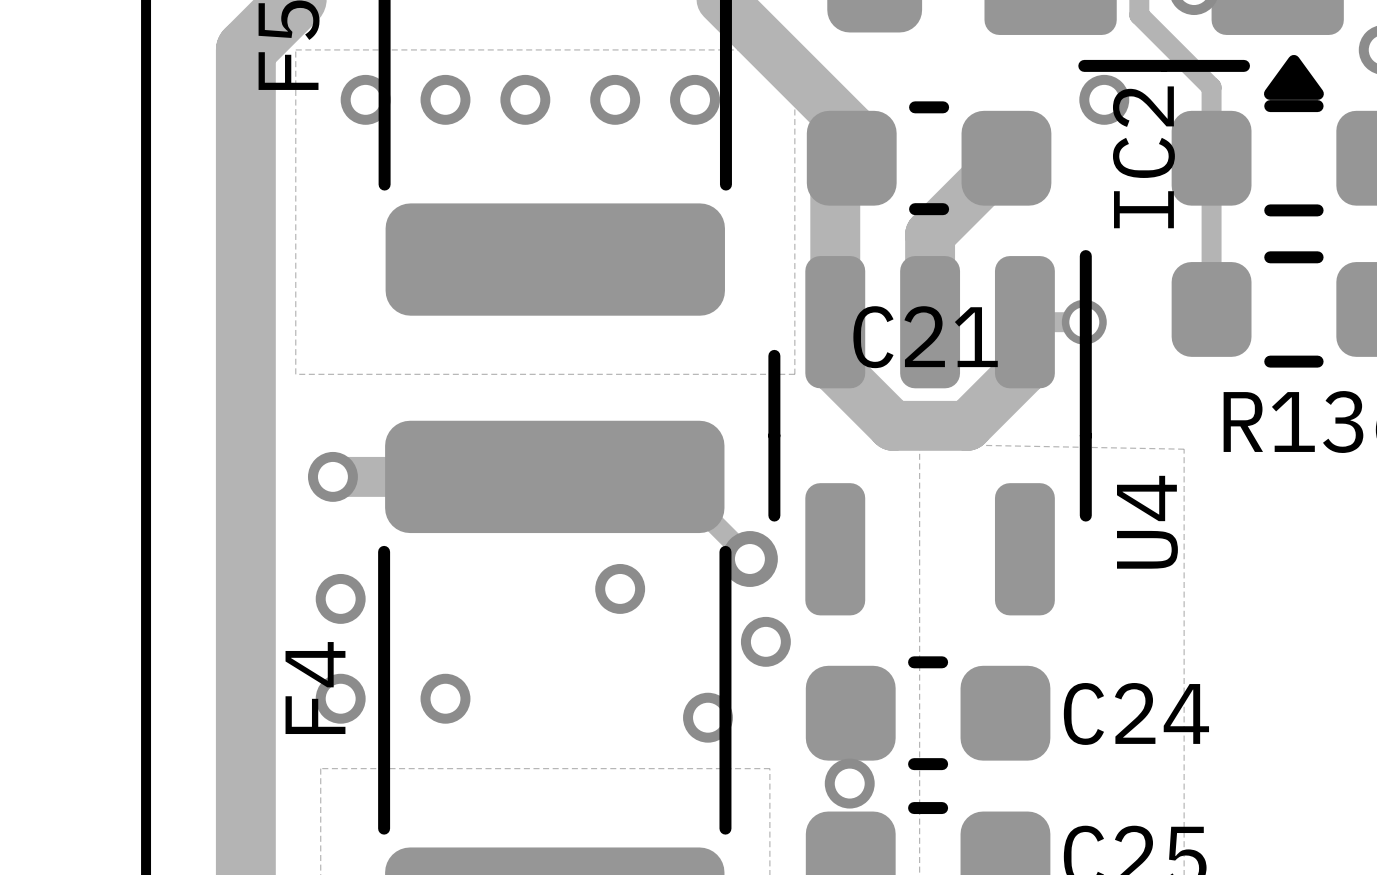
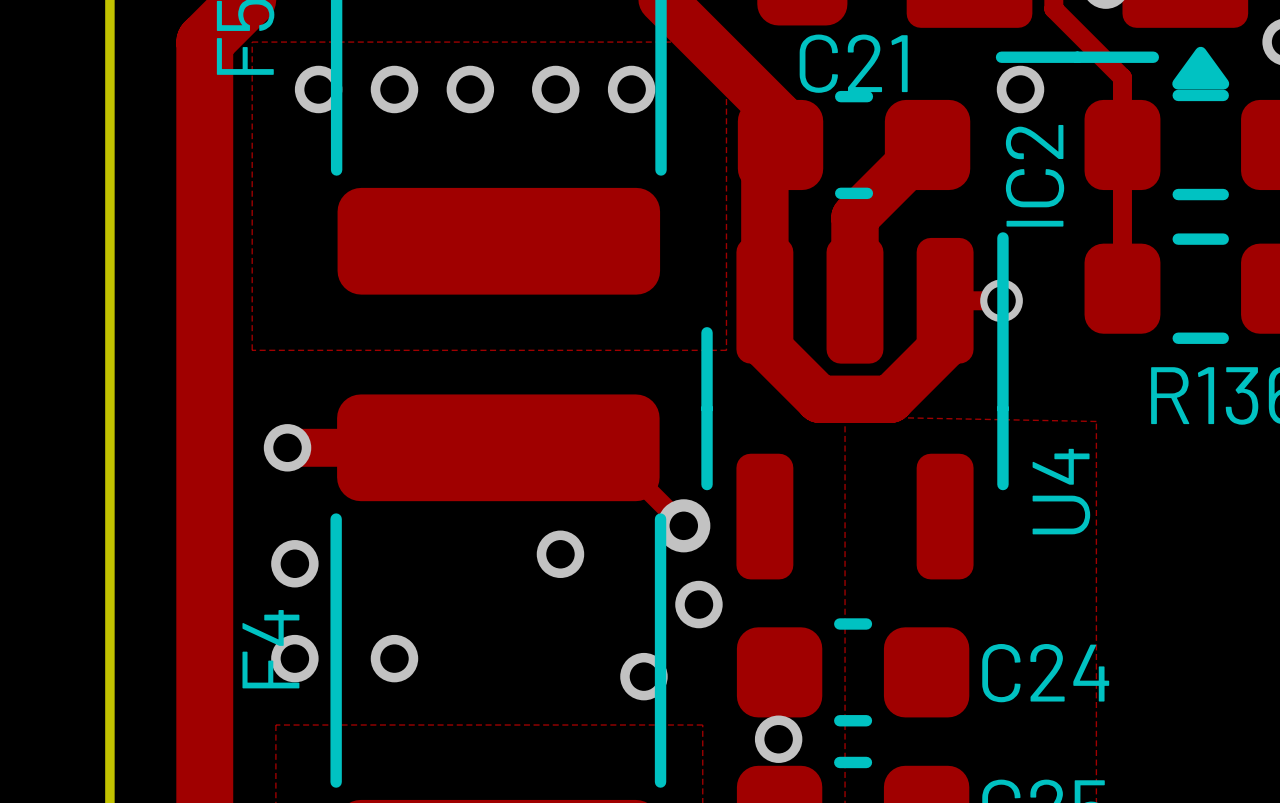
IC2 name position: IC2 (1143, 157) -> IC2 (1035, 175)
C21 name position: C21 (925, 337) -> C21 (853, 63)

